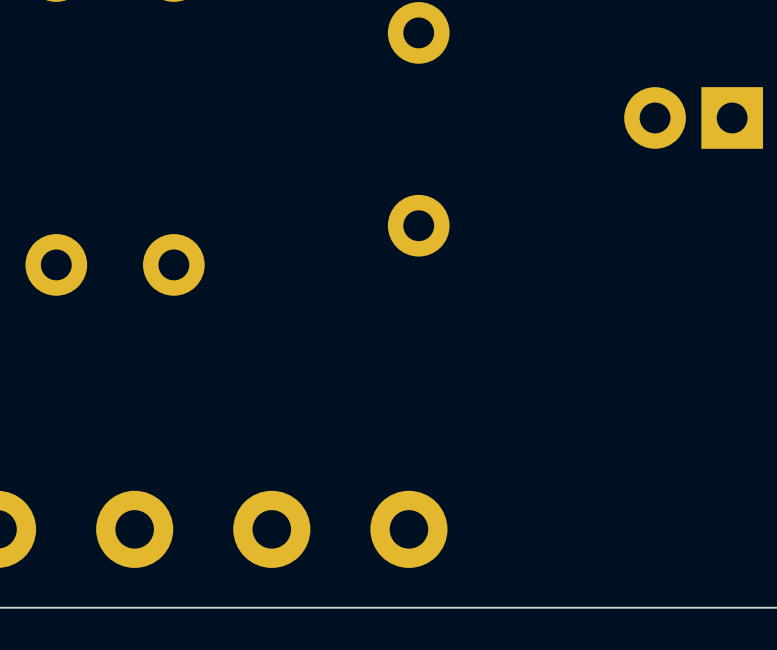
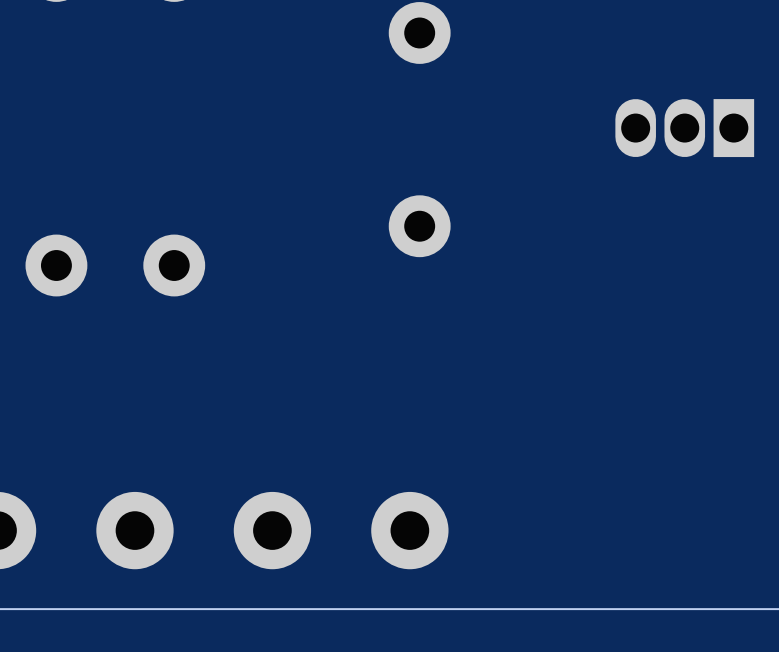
part footprint: [624, 87, 764, 149] -> [615, 99, 755, 158]

